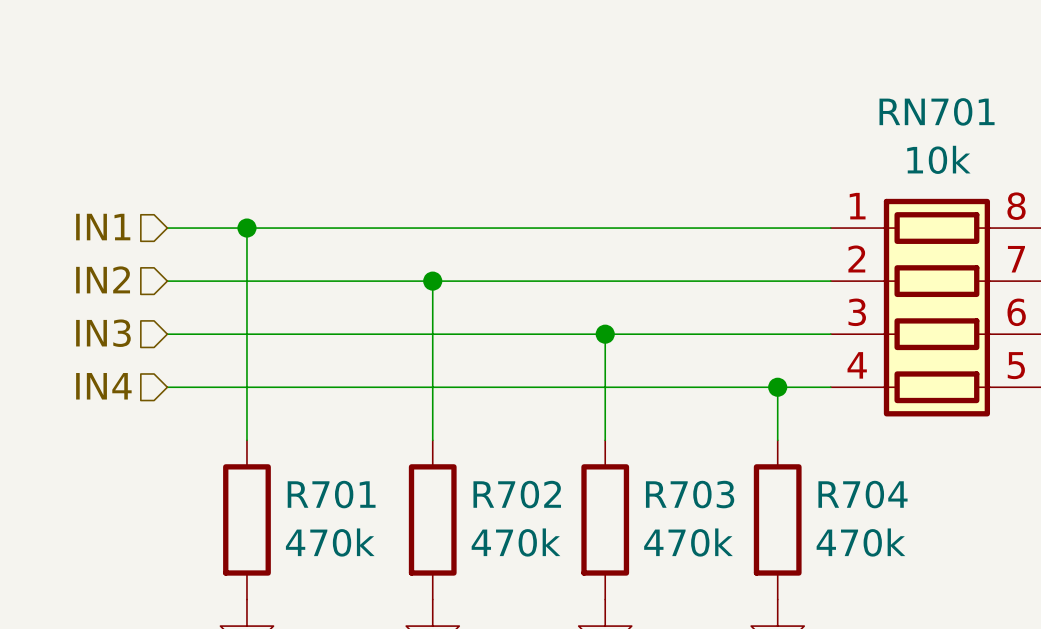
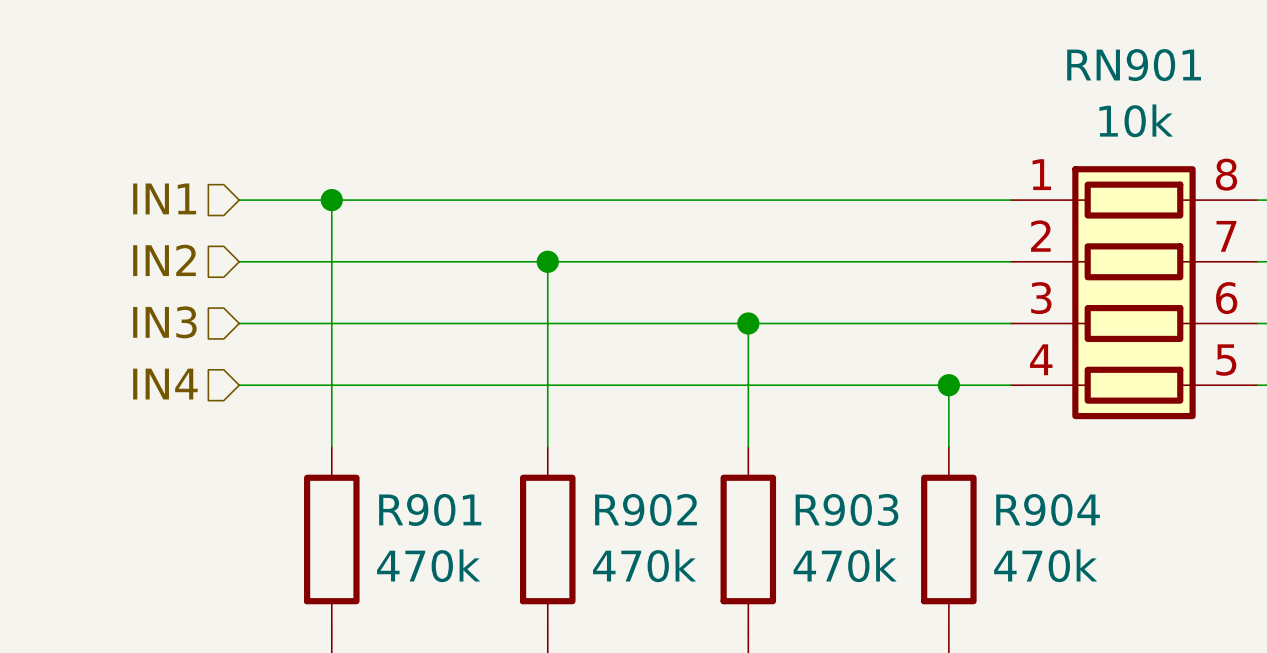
RN701 name: RN701 (937, 111) -> RN901 (1134, 65)
R701 name: R701 (331, 494) -> R901 (430, 509)
R702 name: R702 (517, 494) -> R902 (646, 509)
R703 name: R703 (690, 494) -> R903 (846, 509)
R704 name: R704 (863, 494) -> R904 (1048, 509)

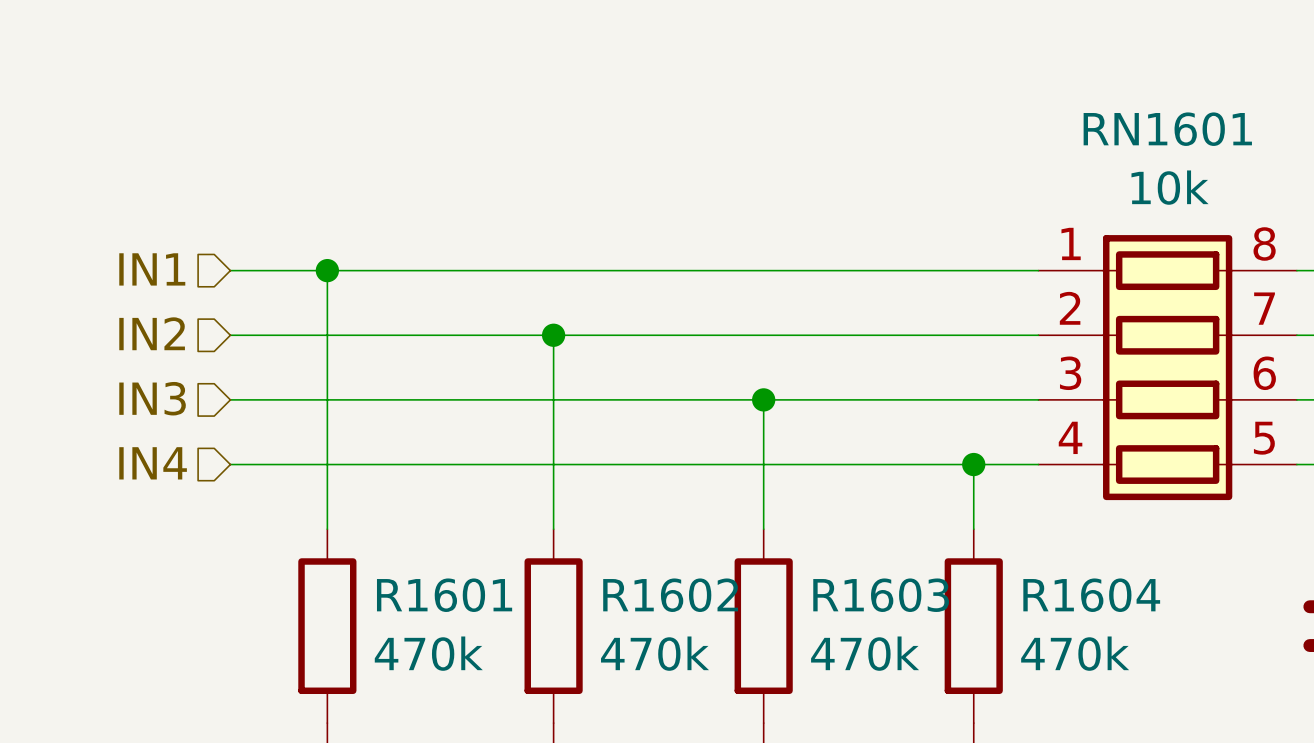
RN901 name: RN901 (1134, 65) -> RN1601 (1167, 129)
R901 name: R901 (430, 509) -> R1601 (444, 595)
R902 name: R902 (646, 509) -> R1602 (670, 595)
R903 name: R903 (846, 509) -> R1603 (881, 595)
R904 name: R904 (1048, 509) -> R1604 (1091, 595)

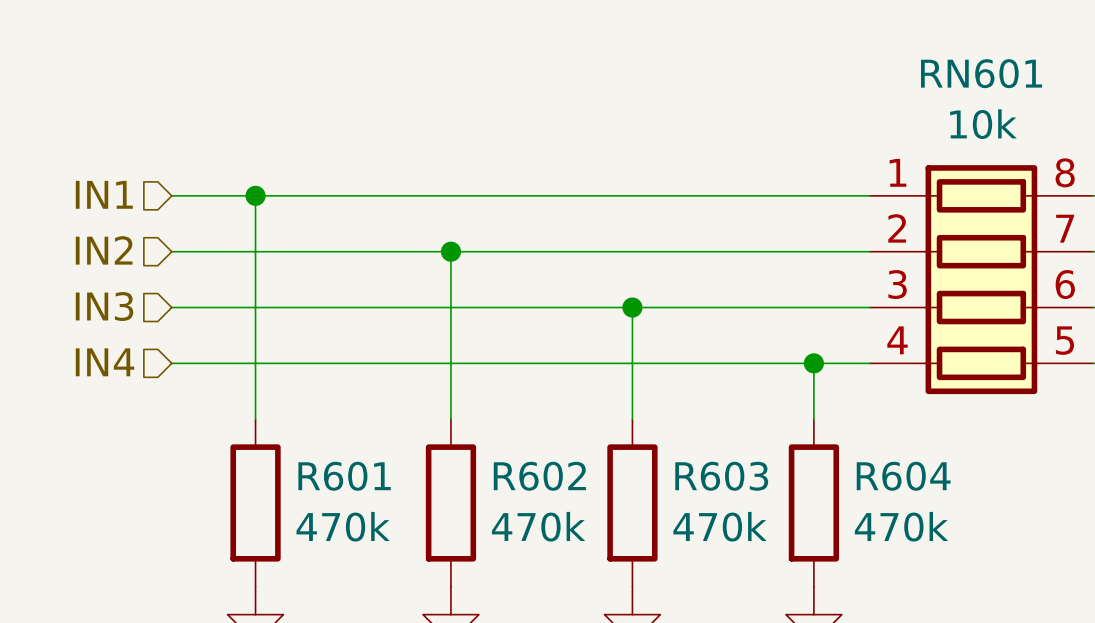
RN1601 name: RN1601 (1167, 129) -> RN601 (981, 73)
R1601 name: R1601 (444, 595) -> R601 (344, 476)
R1602 name: R1602 (670, 595) -> R602 (539, 476)
R1603 name: R1603 (881, 595) -> R603 (721, 476)
R1604 name: R1604 (1091, 595) -> R604 (903, 476)

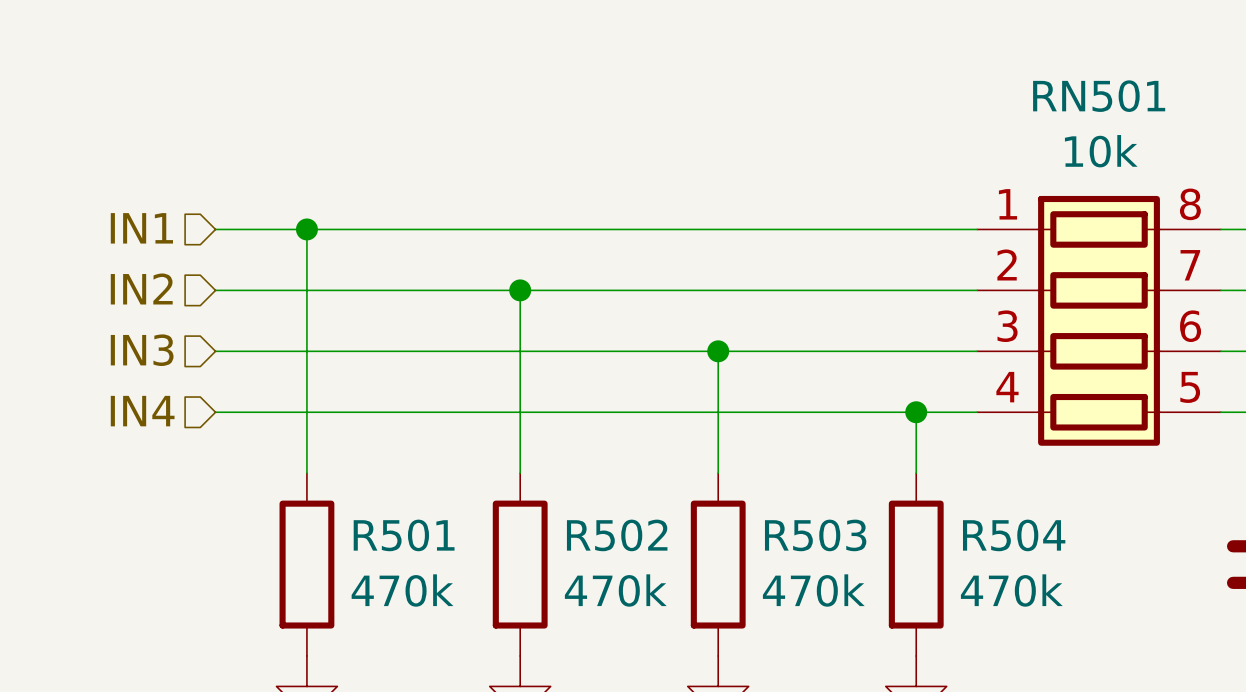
RN601 name: RN601 (981, 73) -> RN501 (1099, 96)
R601 name: R601 (344, 476) -> R501 (404, 535)
R602 name: R602 (539, 476) -> R502 (617, 535)
R603 name: R603 (721, 476) -> R503 (815, 535)
R604 name: R604 (903, 476) -> R504 (1014, 535)

